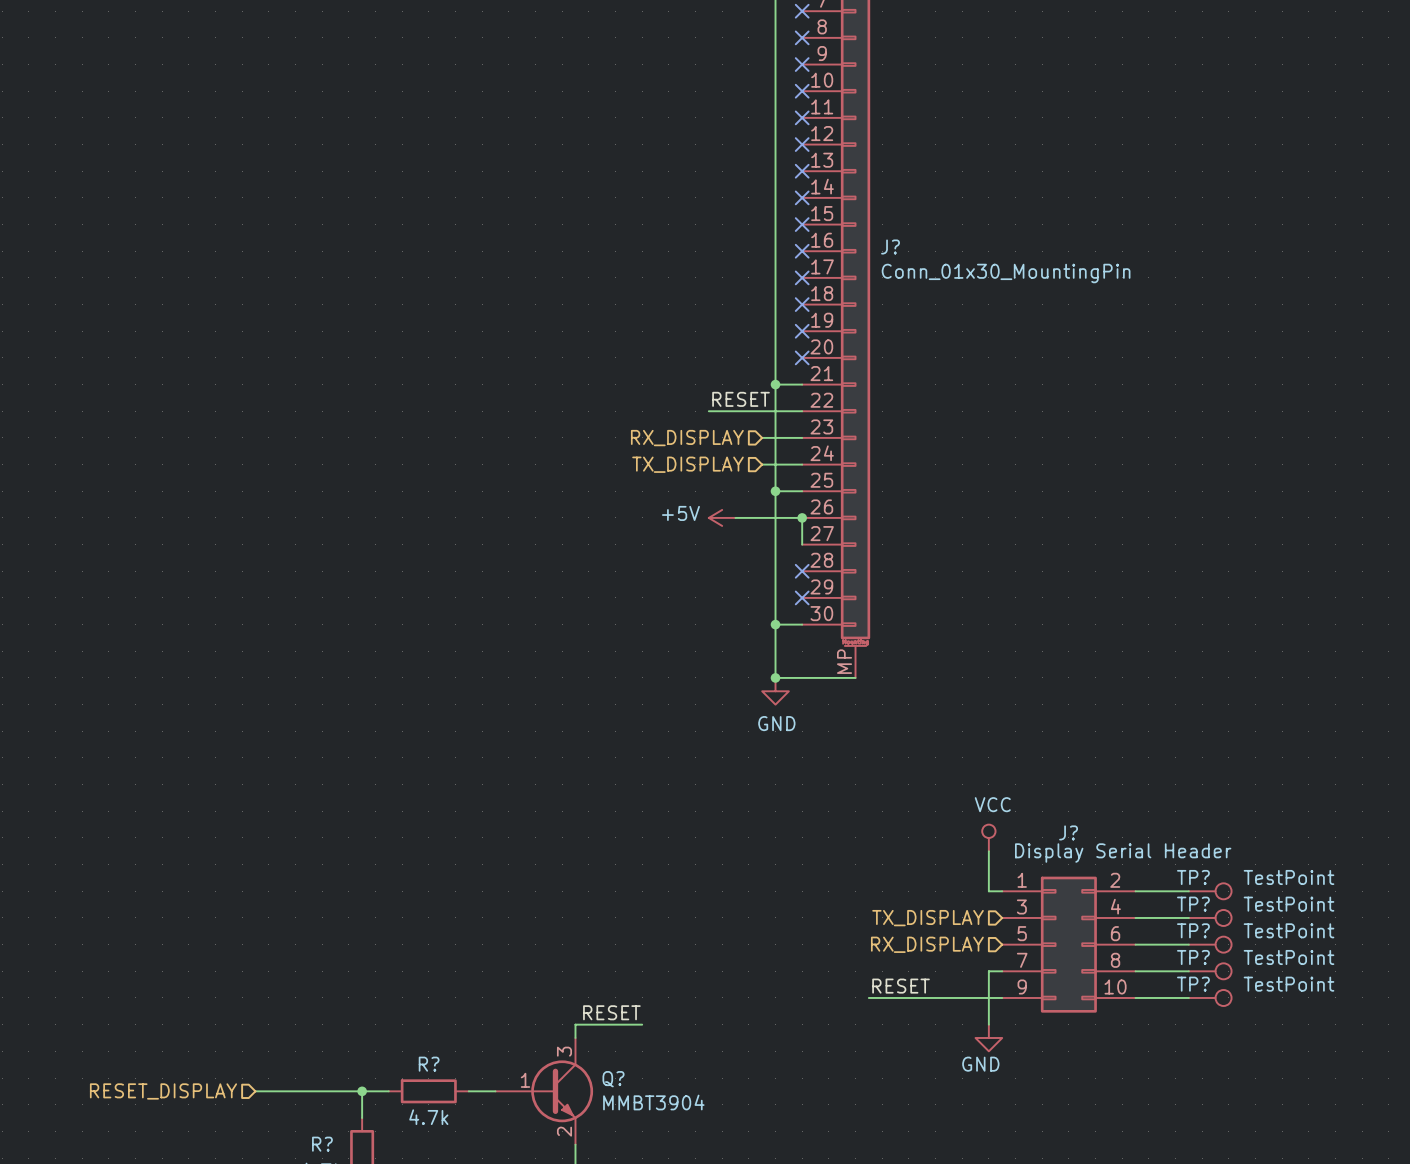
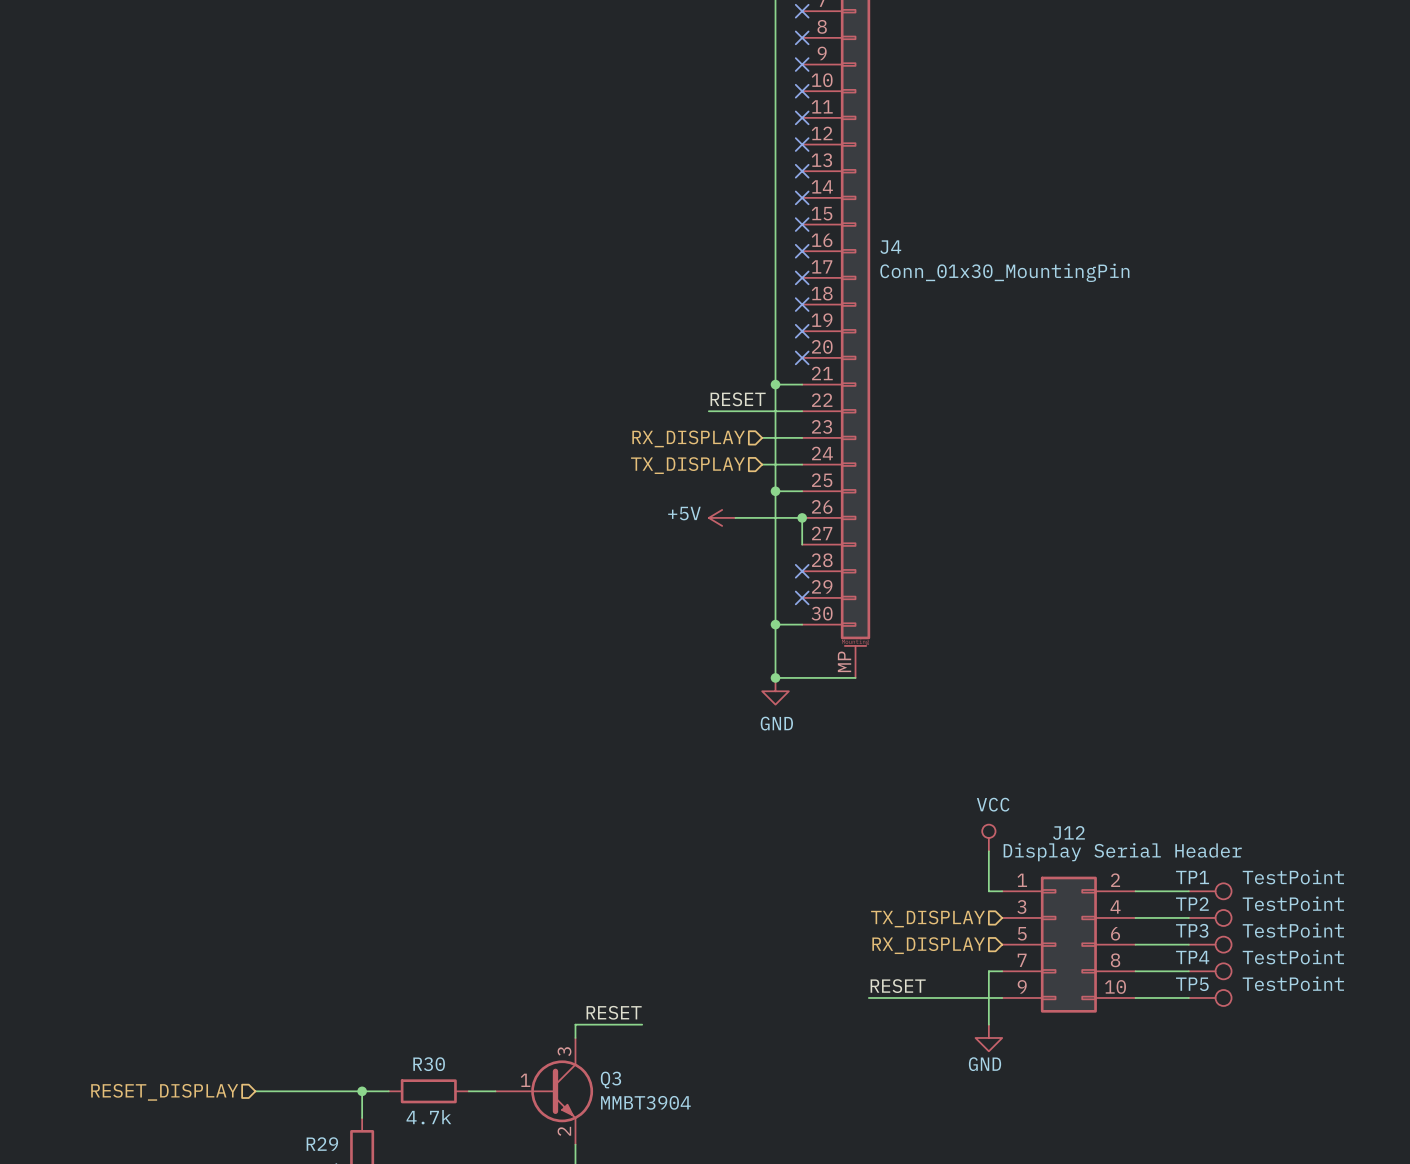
J? name: J? (890, 247) -> J4 (890, 247)
J? name: J? (1068, 832) -> J12 (1068, 832)
TP? name: TP? (1193, 877) -> TP1 (1192, 877)
TP? name: TP? (1193, 904) -> TP2 (1192, 904)
TP? name: TP? (1193, 930) -> TP3 (1192, 930)
TP? name: TP? (1193, 957) -> TP4 (1192, 957)
TP? name: TP? (1193, 984) -> TP5 (1192, 984)
R? name: R? (429, 1064) -> R30 (429, 1064)
Q? name: Q? (613, 1079) -> Q3 (610, 1080)
R? name: R? (322, 1144) -> R29 (322, 1144)

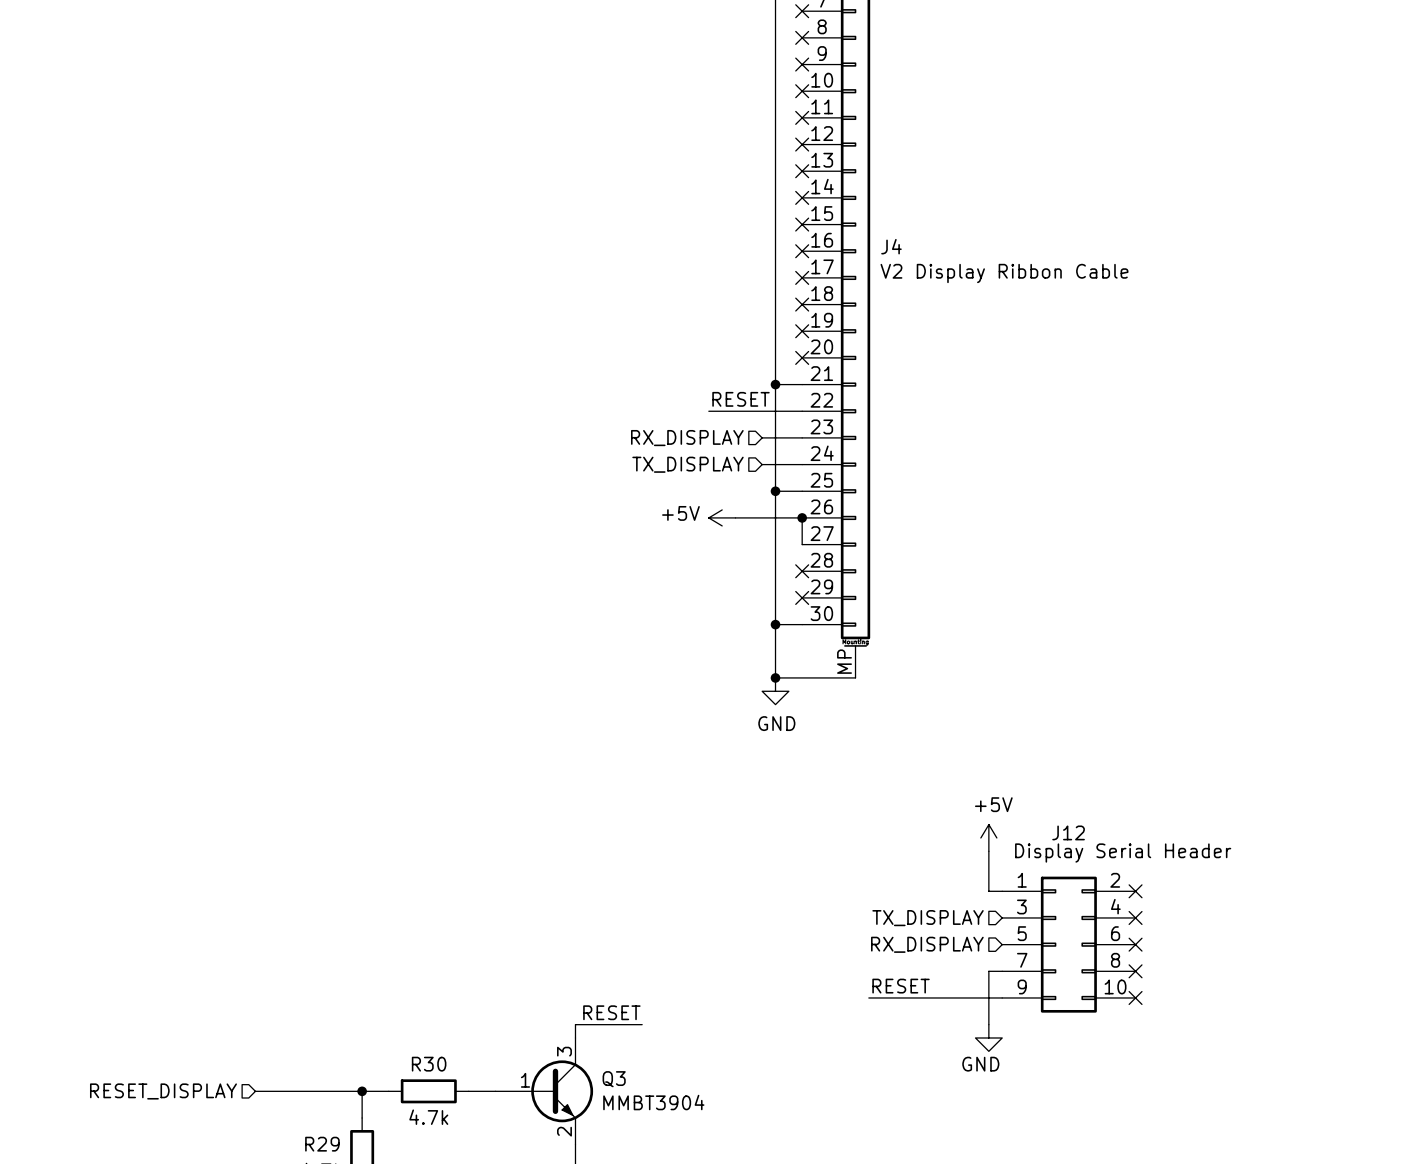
J4 value: Conn_01x30_MountingPin (1004, 272) -> V2 Display Ribbon Cable (1004, 273)
power symbol: VCC (988, 837) -> +5V (988, 837)
wire: (1135, 891) (1188, 891) -> none
no-connect mark: none -> (1135, 891)
TP1: TestPoint (1210, 891) -> none
wire: (1135, 917) (1188, 917) -> none
no-connect mark: none -> (1135, 917)
TP2: TestPoint (1210, 917) -> none
wire: (1135, 944) (1188, 944) -> none
no-connect mark: none -> (1135, 944)
TP3: TestPoint (1210, 944) -> none
wire: (1135, 971) (1188, 971) -> none
no-connect mark: none -> (1135, 971)
TP4: TestPoint (1210, 971) -> none
wire: (1135, 997) (1188, 997) -> none
no-connect mark: none -> (1135, 997)
TP5: TestPoint (1210, 997) -> none

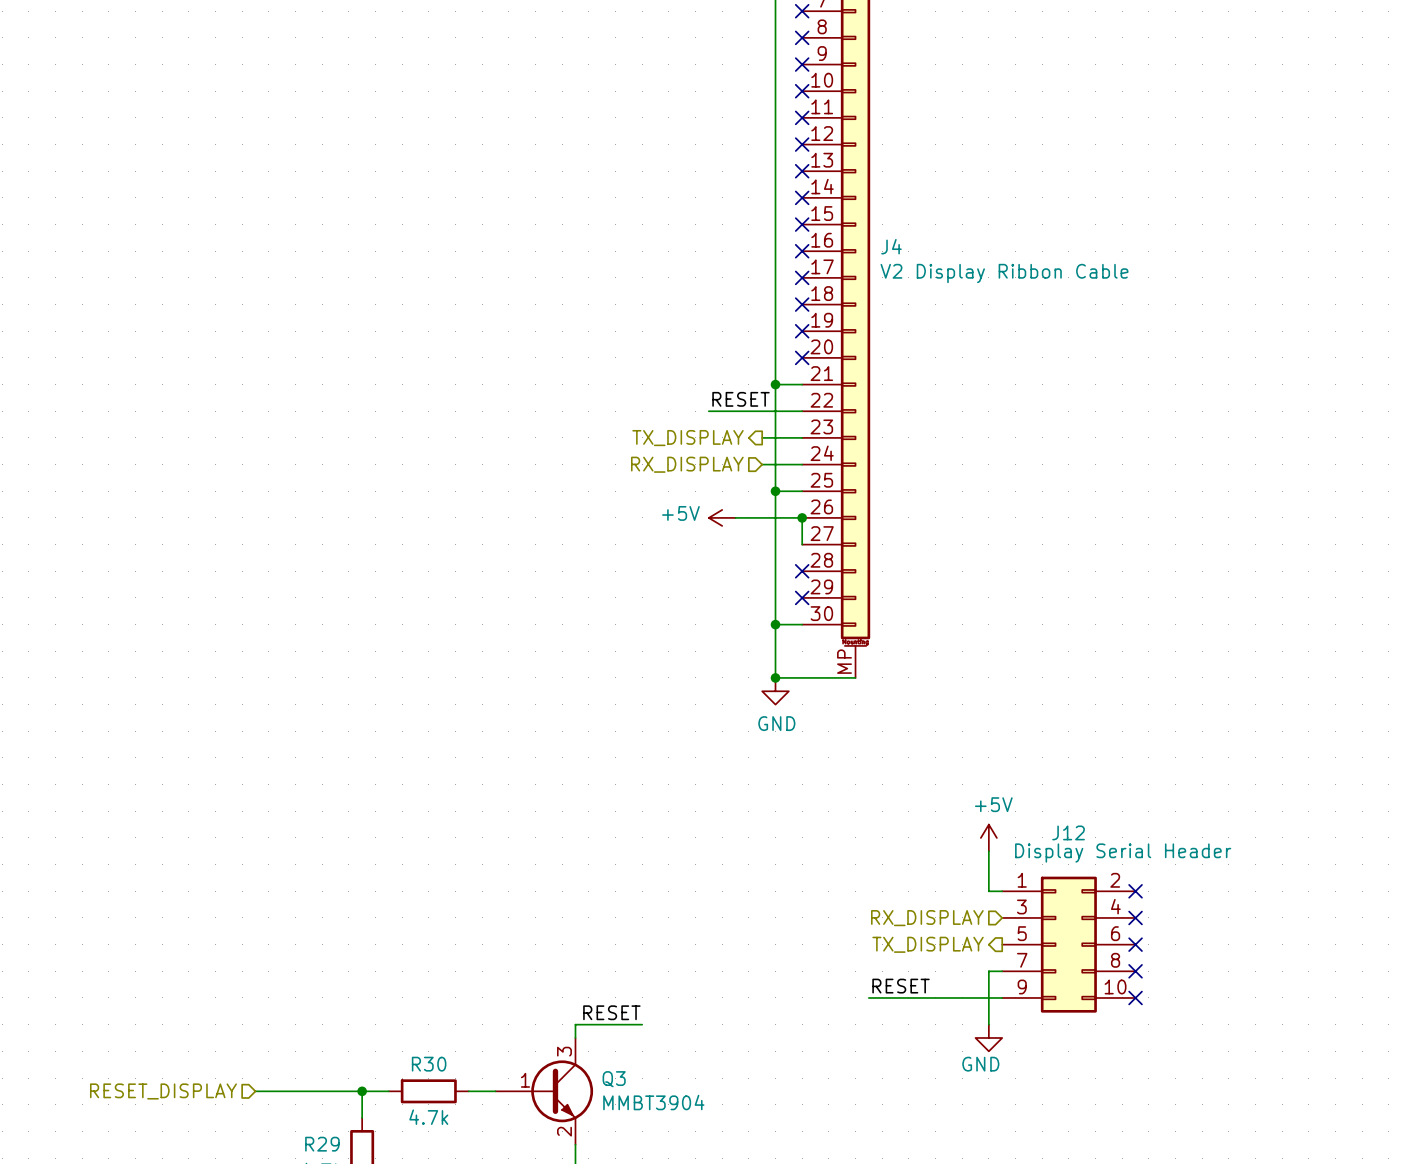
hierarchical label shape: input (687, 438) -> output (687, 438)
hierarchical label: RX_DISPLAY (687, 438) -> TX_DISPLAY (687, 438)
hierarchical label: TX_DISPLAY (687, 464) -> RX_DISPLAY (687, 464)
hierarchical label: TX_DISPLAY (928, 918) -> RX_DISPLAY (927, 918)
hierarchical label shape: input (927, 944) -> output (928, 944)
hierarchical label: RX_DISPLAY (927, 944) -> TX_DISPLAY (928, 944)

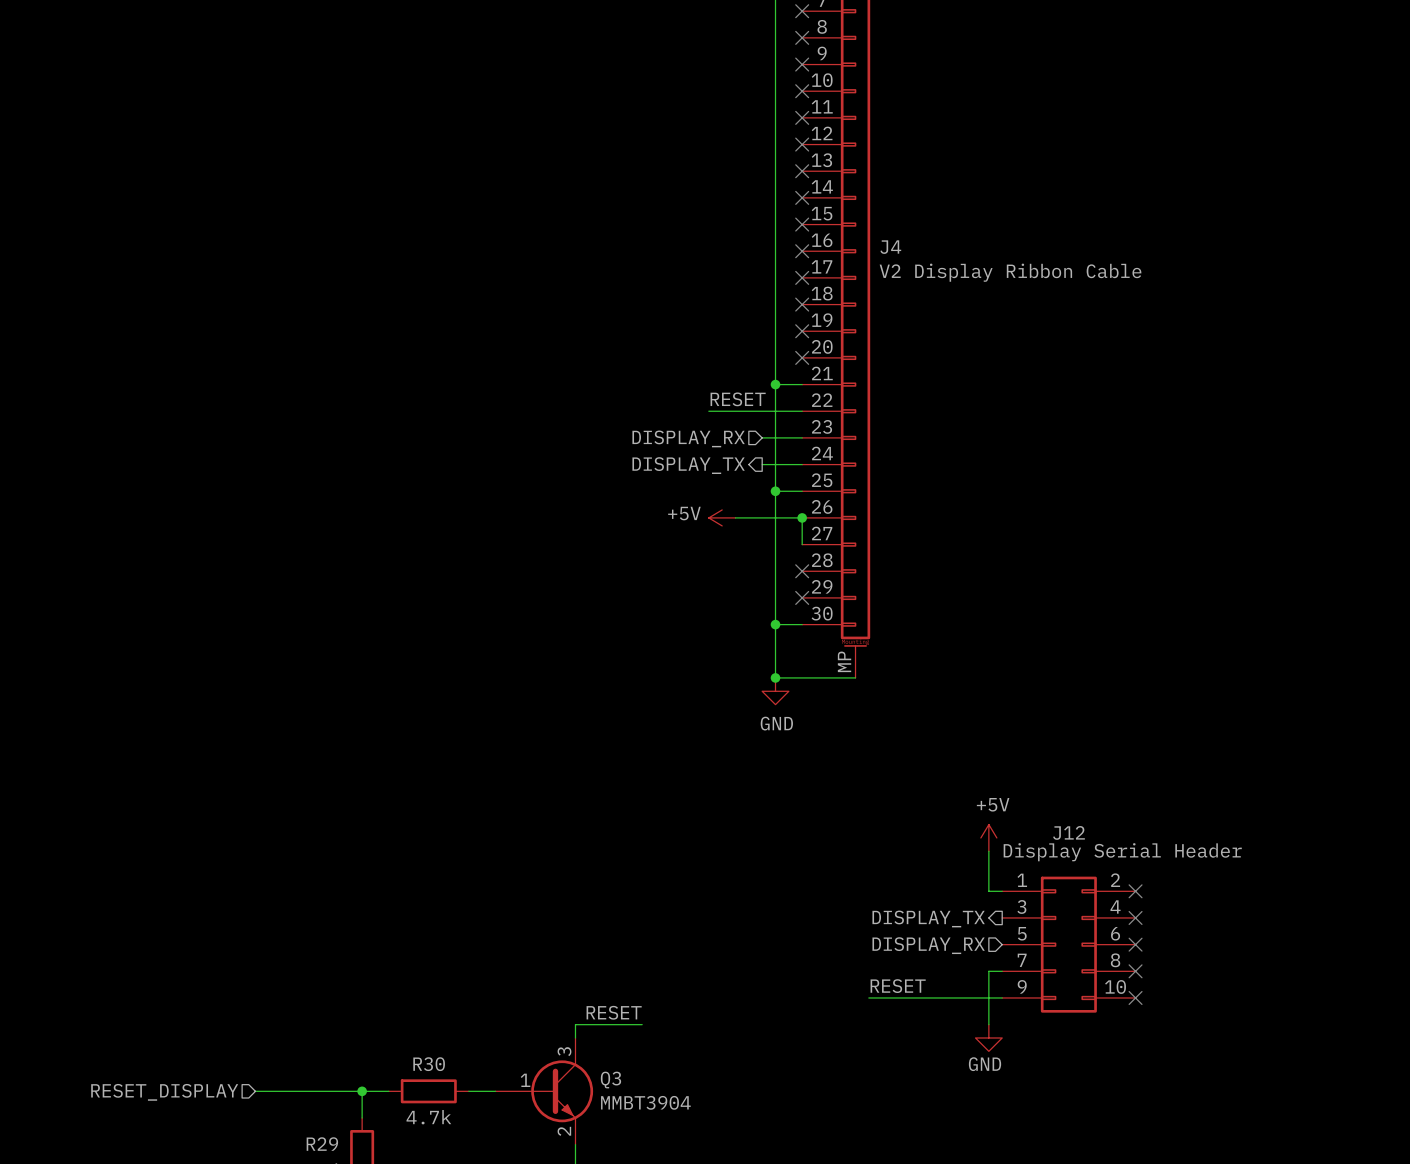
hierarchical label shape: output (687, 438) -> input (688, 438)
hierarchical label: TX_DISPLAY (687, 438) -> DISPLAY_RX (688, 438)
hierarchical label shape: input (687, 464) -> output (688, 465)
hierarchical label: RX_DISPLAY (687, 464) -> DISPLAY_TX (688, 465)
hierarchical label shape: input (927, 918) -> output (928, 918)
hierarchical label: RX_DISPLAY (927, 918) -> DISPLAY_TX (928, 918)
hierarchical label shape: output (928, 944) -> input (928, 945)
hierarchical label: TX_DISPLAY (928, 944) -> DISPLAY_RX (928, 945)

